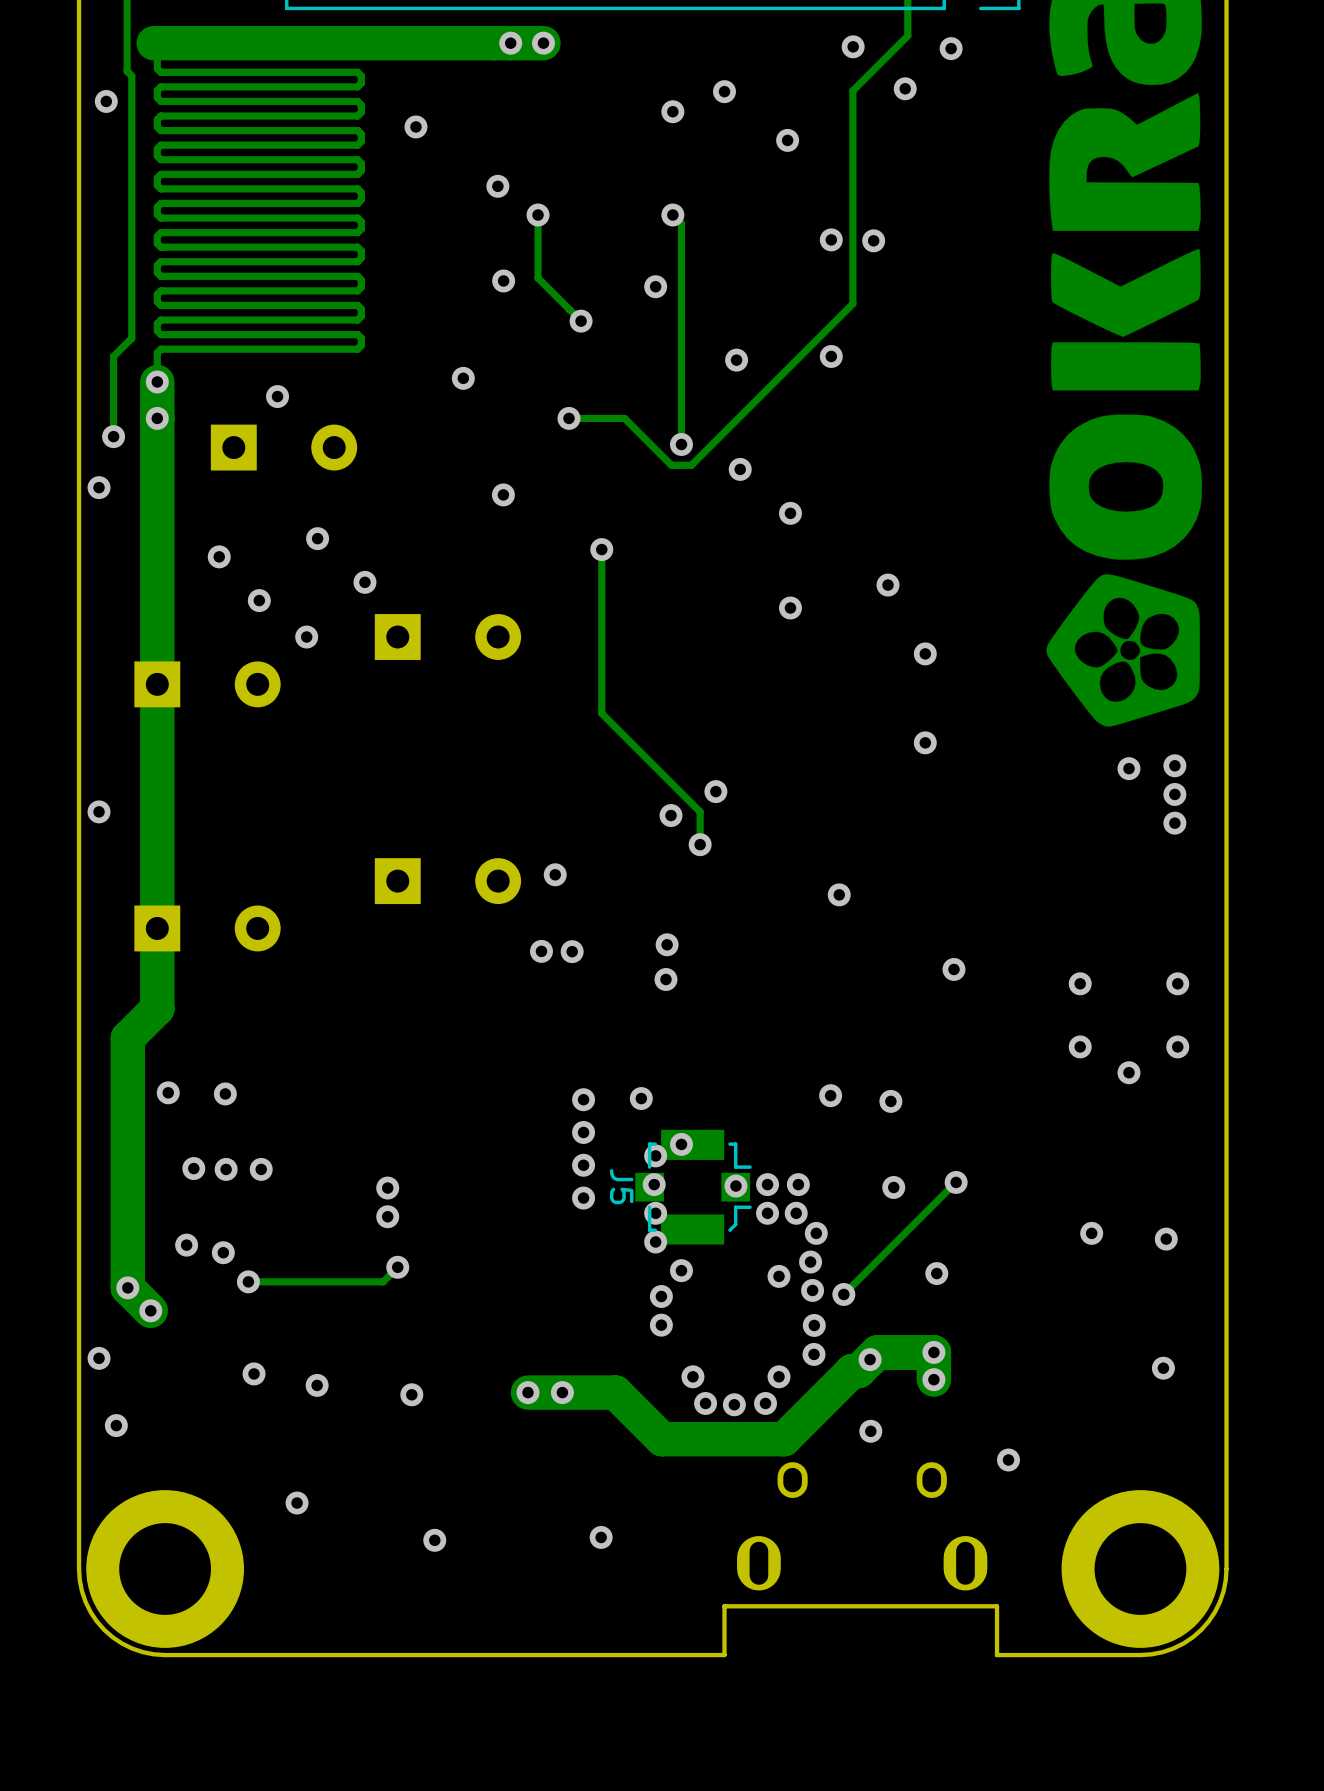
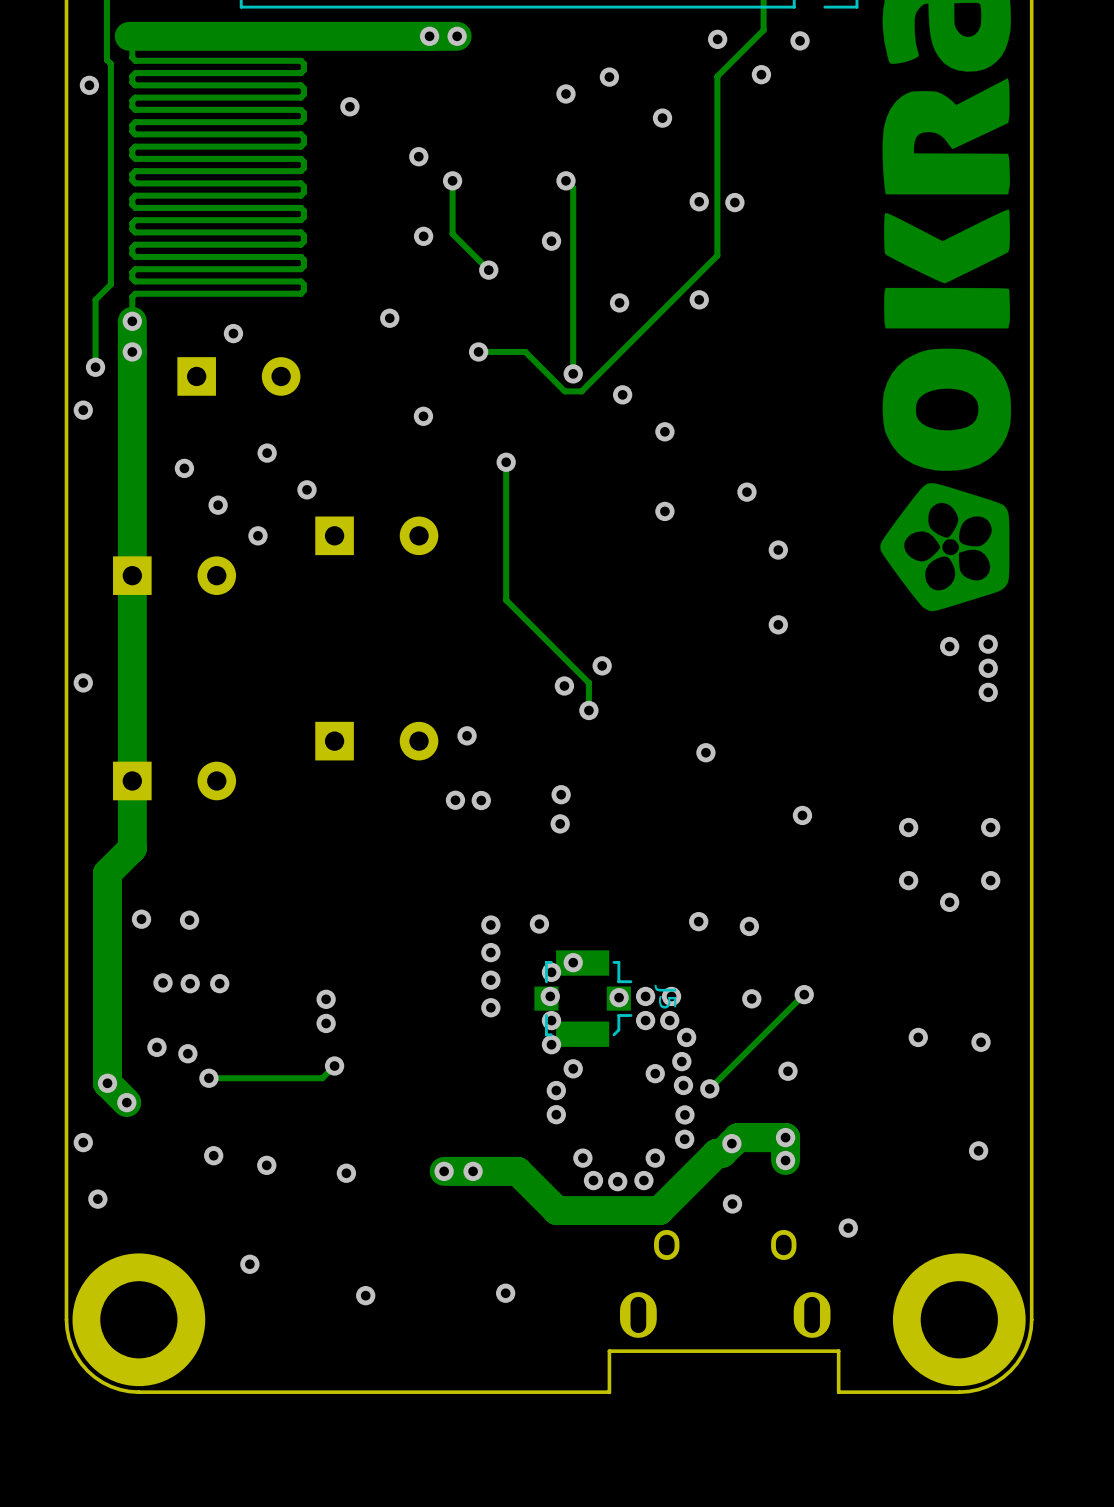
J5 name position: J5 (621, 1186) -> J5 (665, 996)

